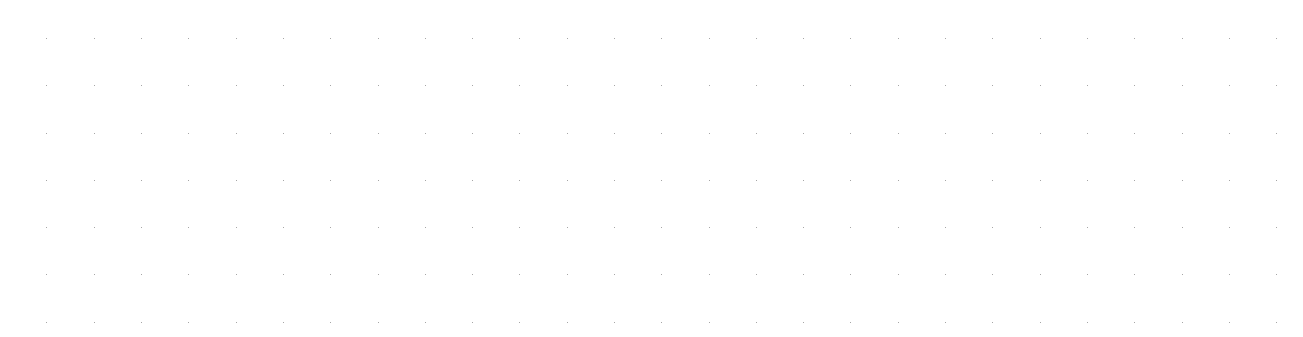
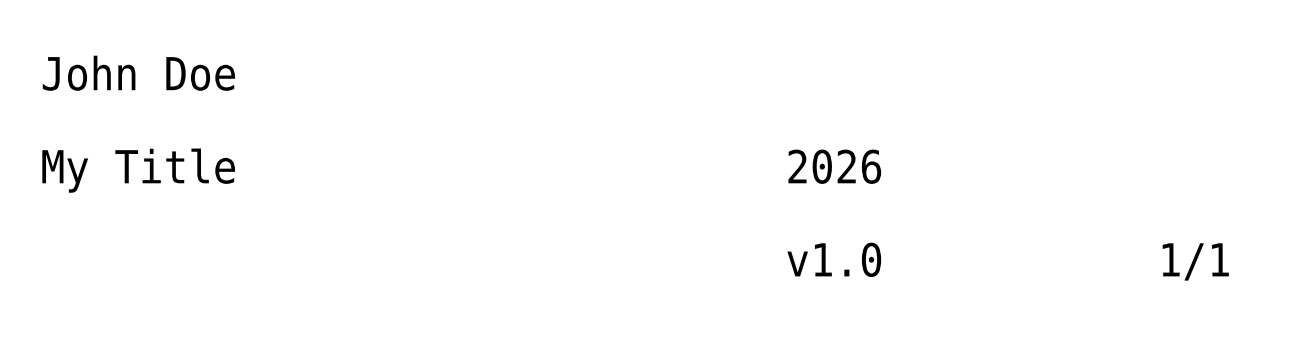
text: none -> John Doe (138, 73)
text: none -> 2026 (834, 166)
text: none -> My Title (138, 170)
text: none -> v1.0 (834, 259)
text: none -> 1/1 (1195, 261)

